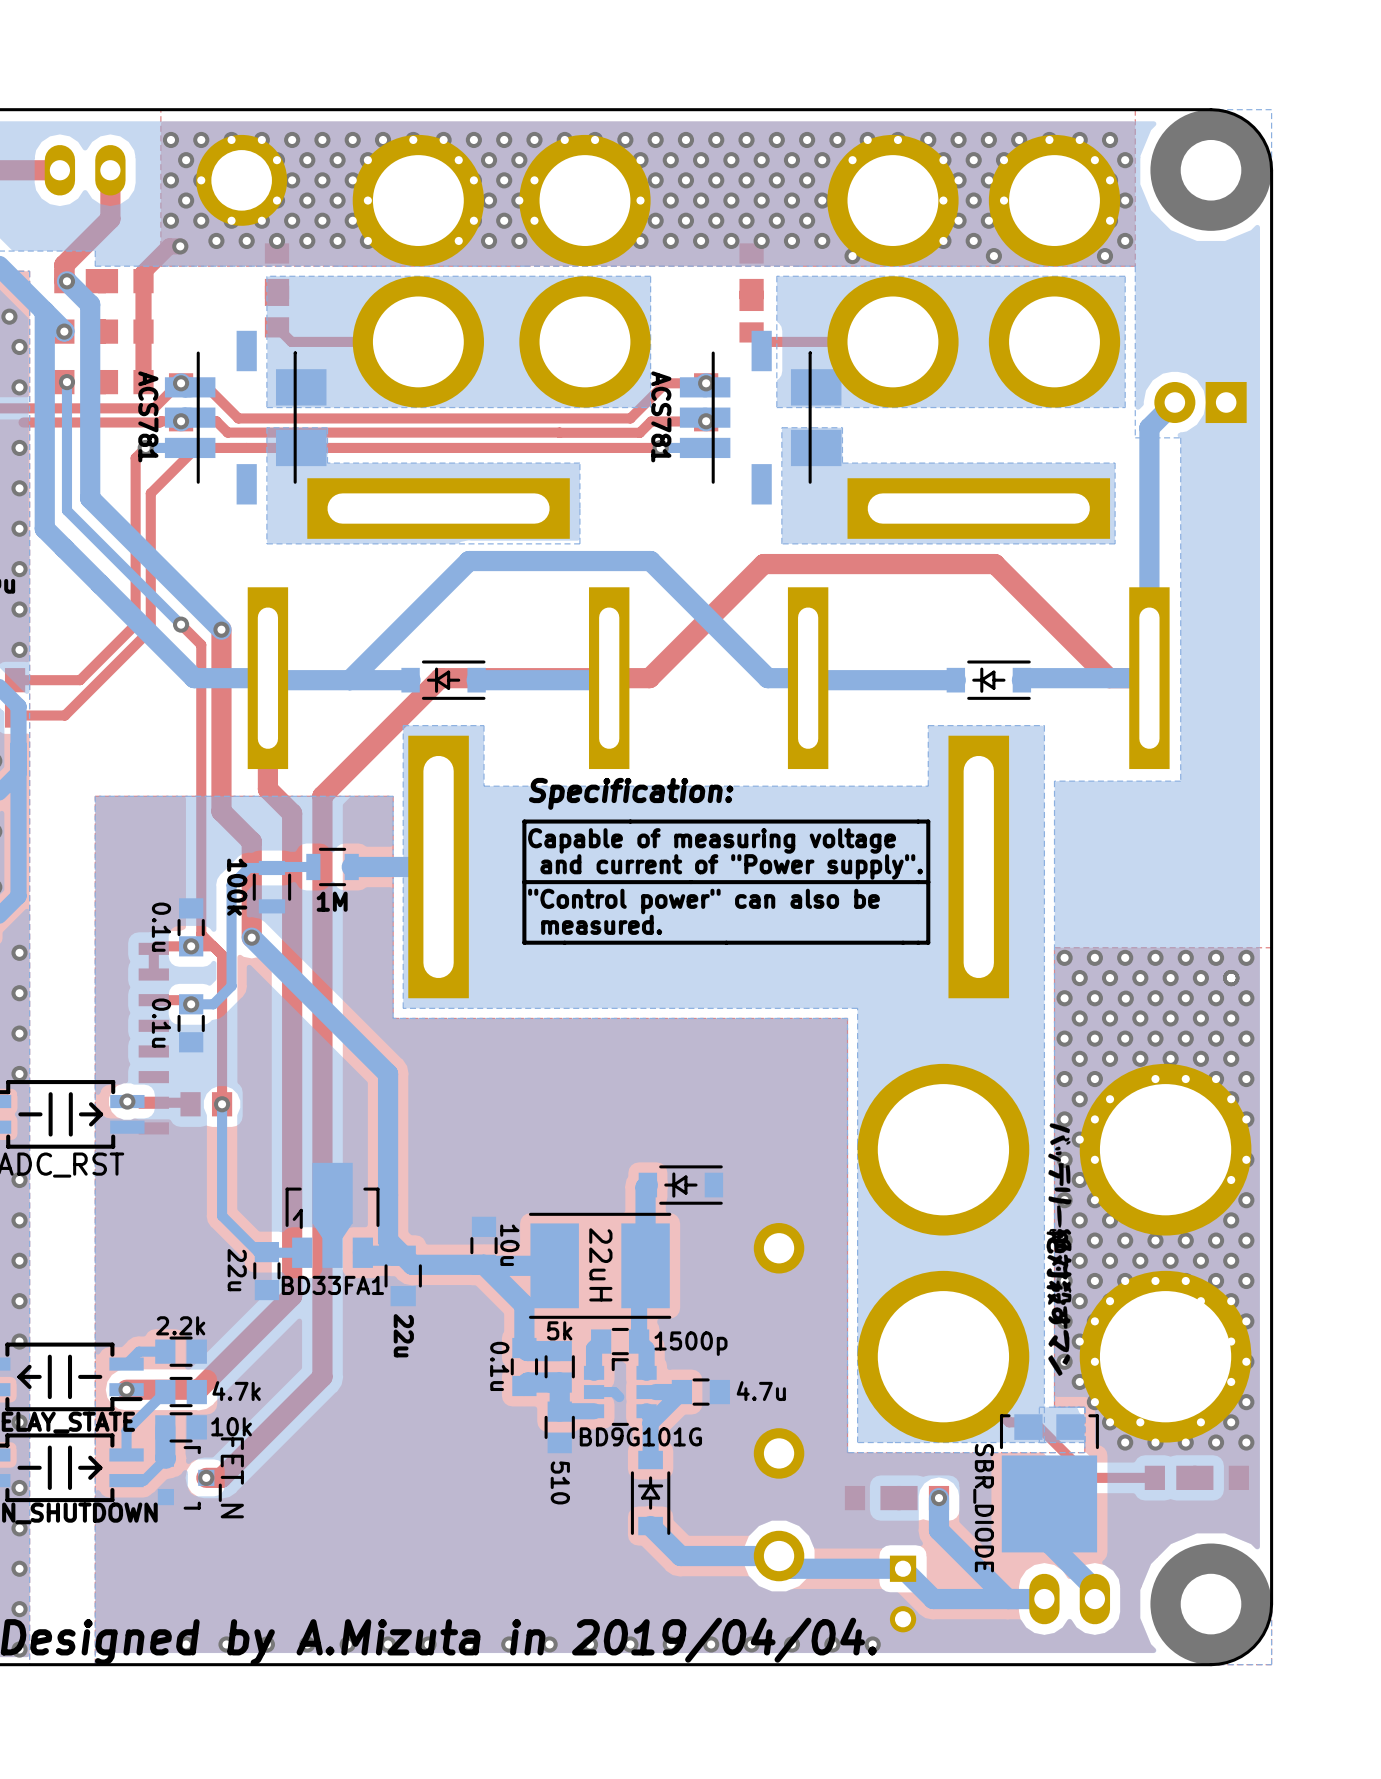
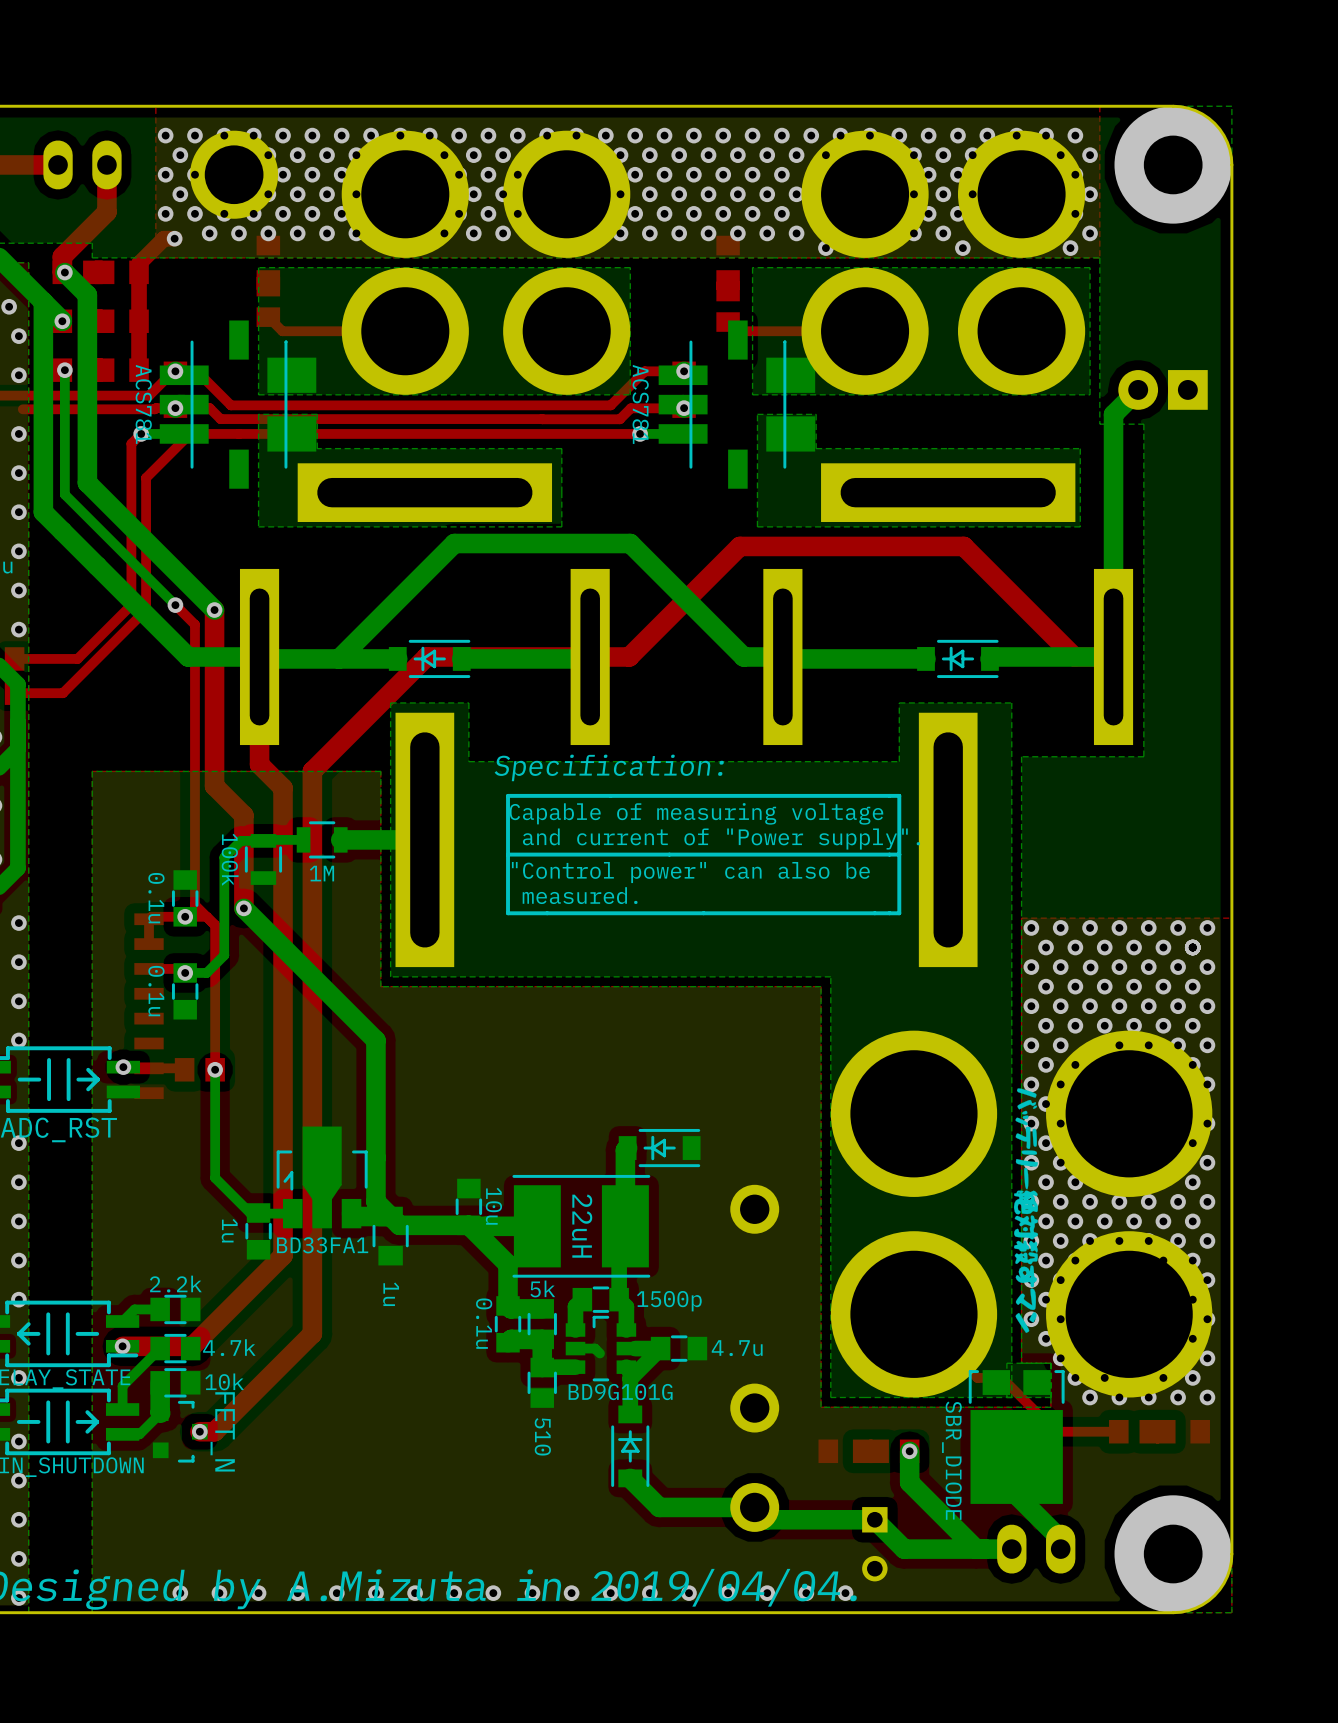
part value: 22u (237, 1270) -> 1u (229, 1230)
part value: 22u (403, 1335) -> 1u (391, 1294)

